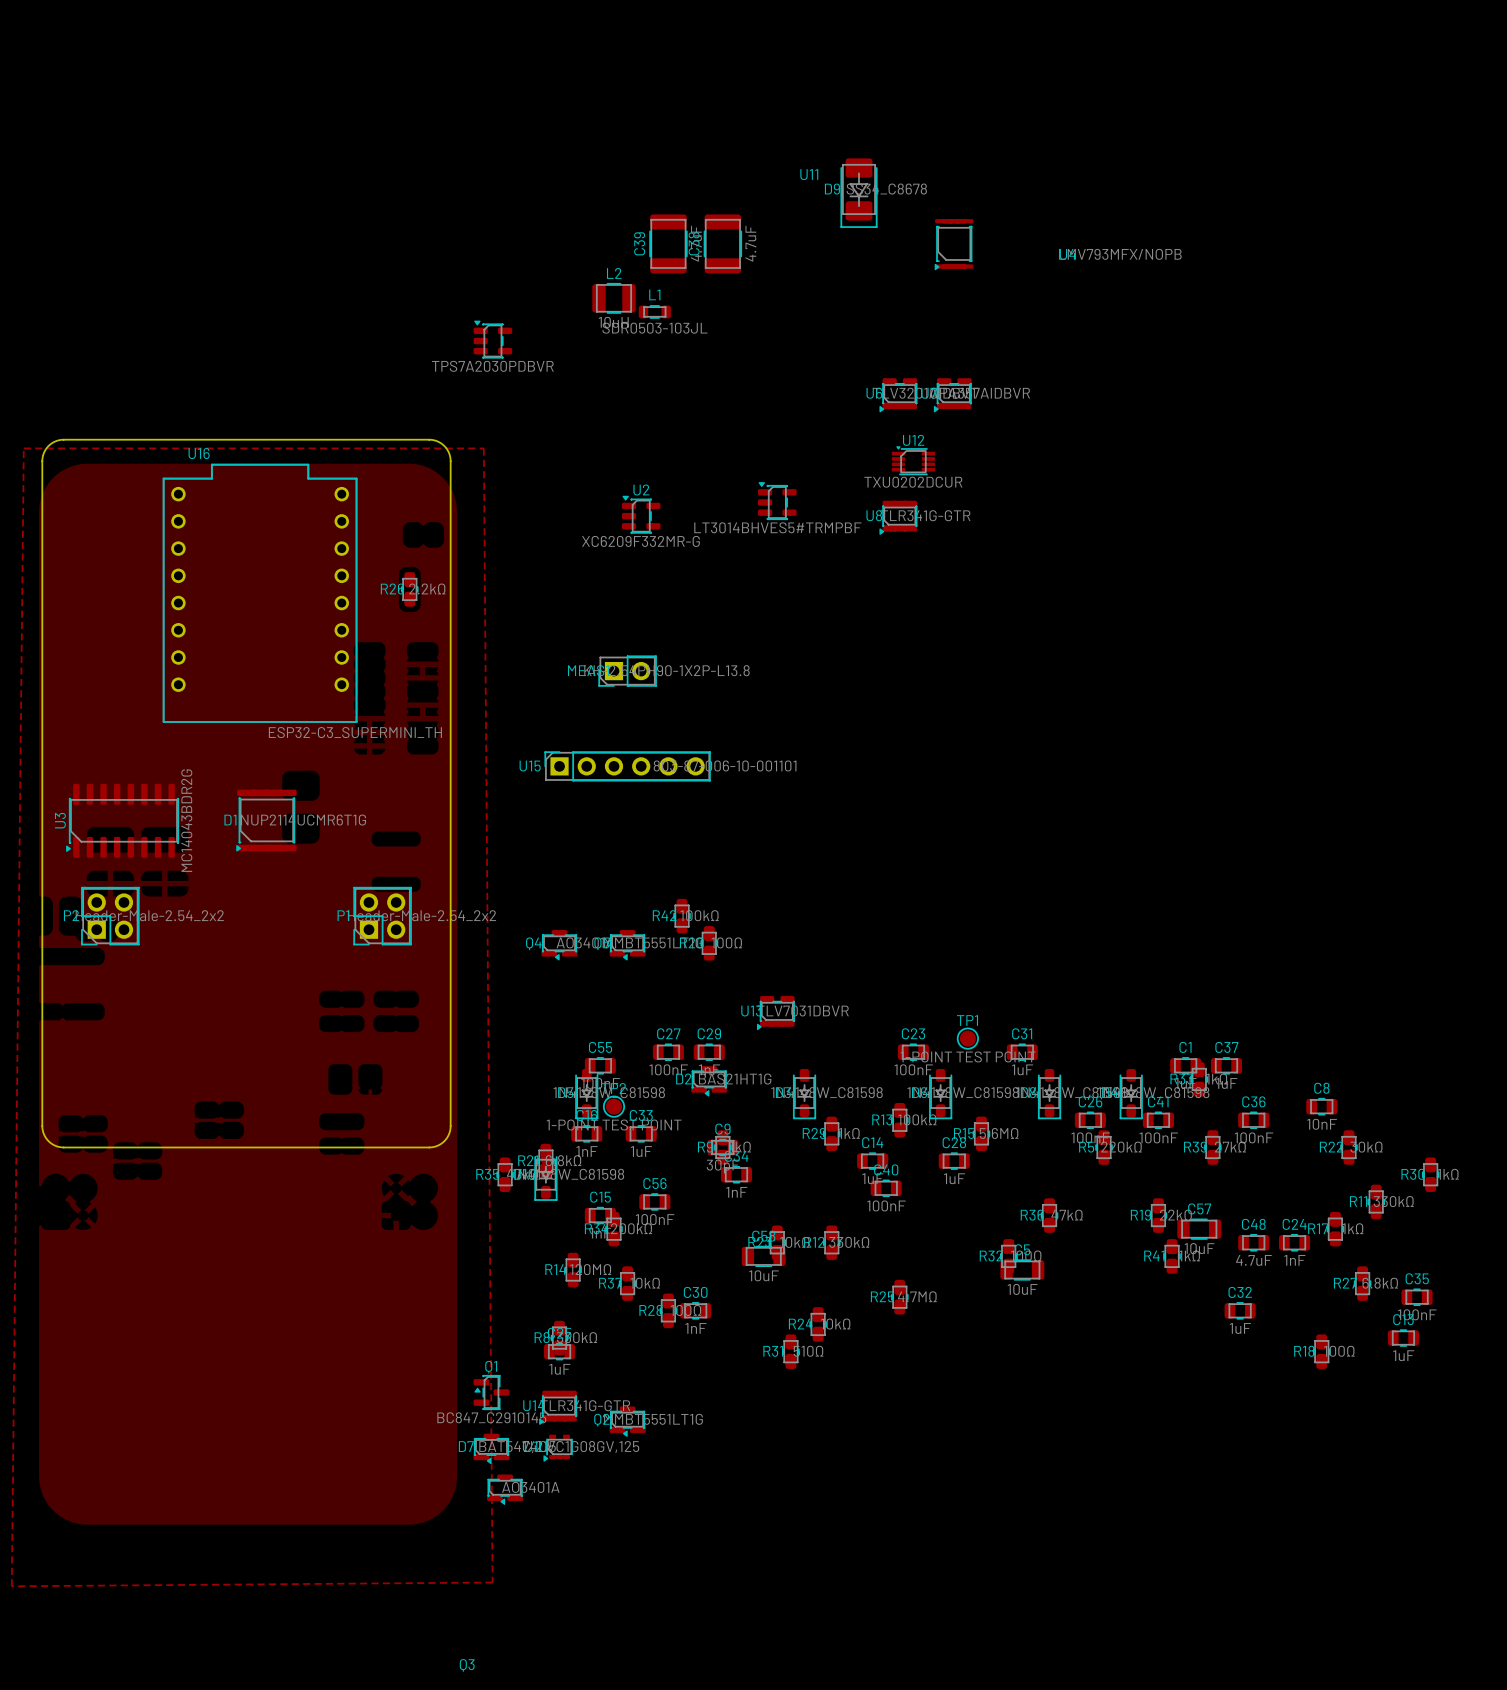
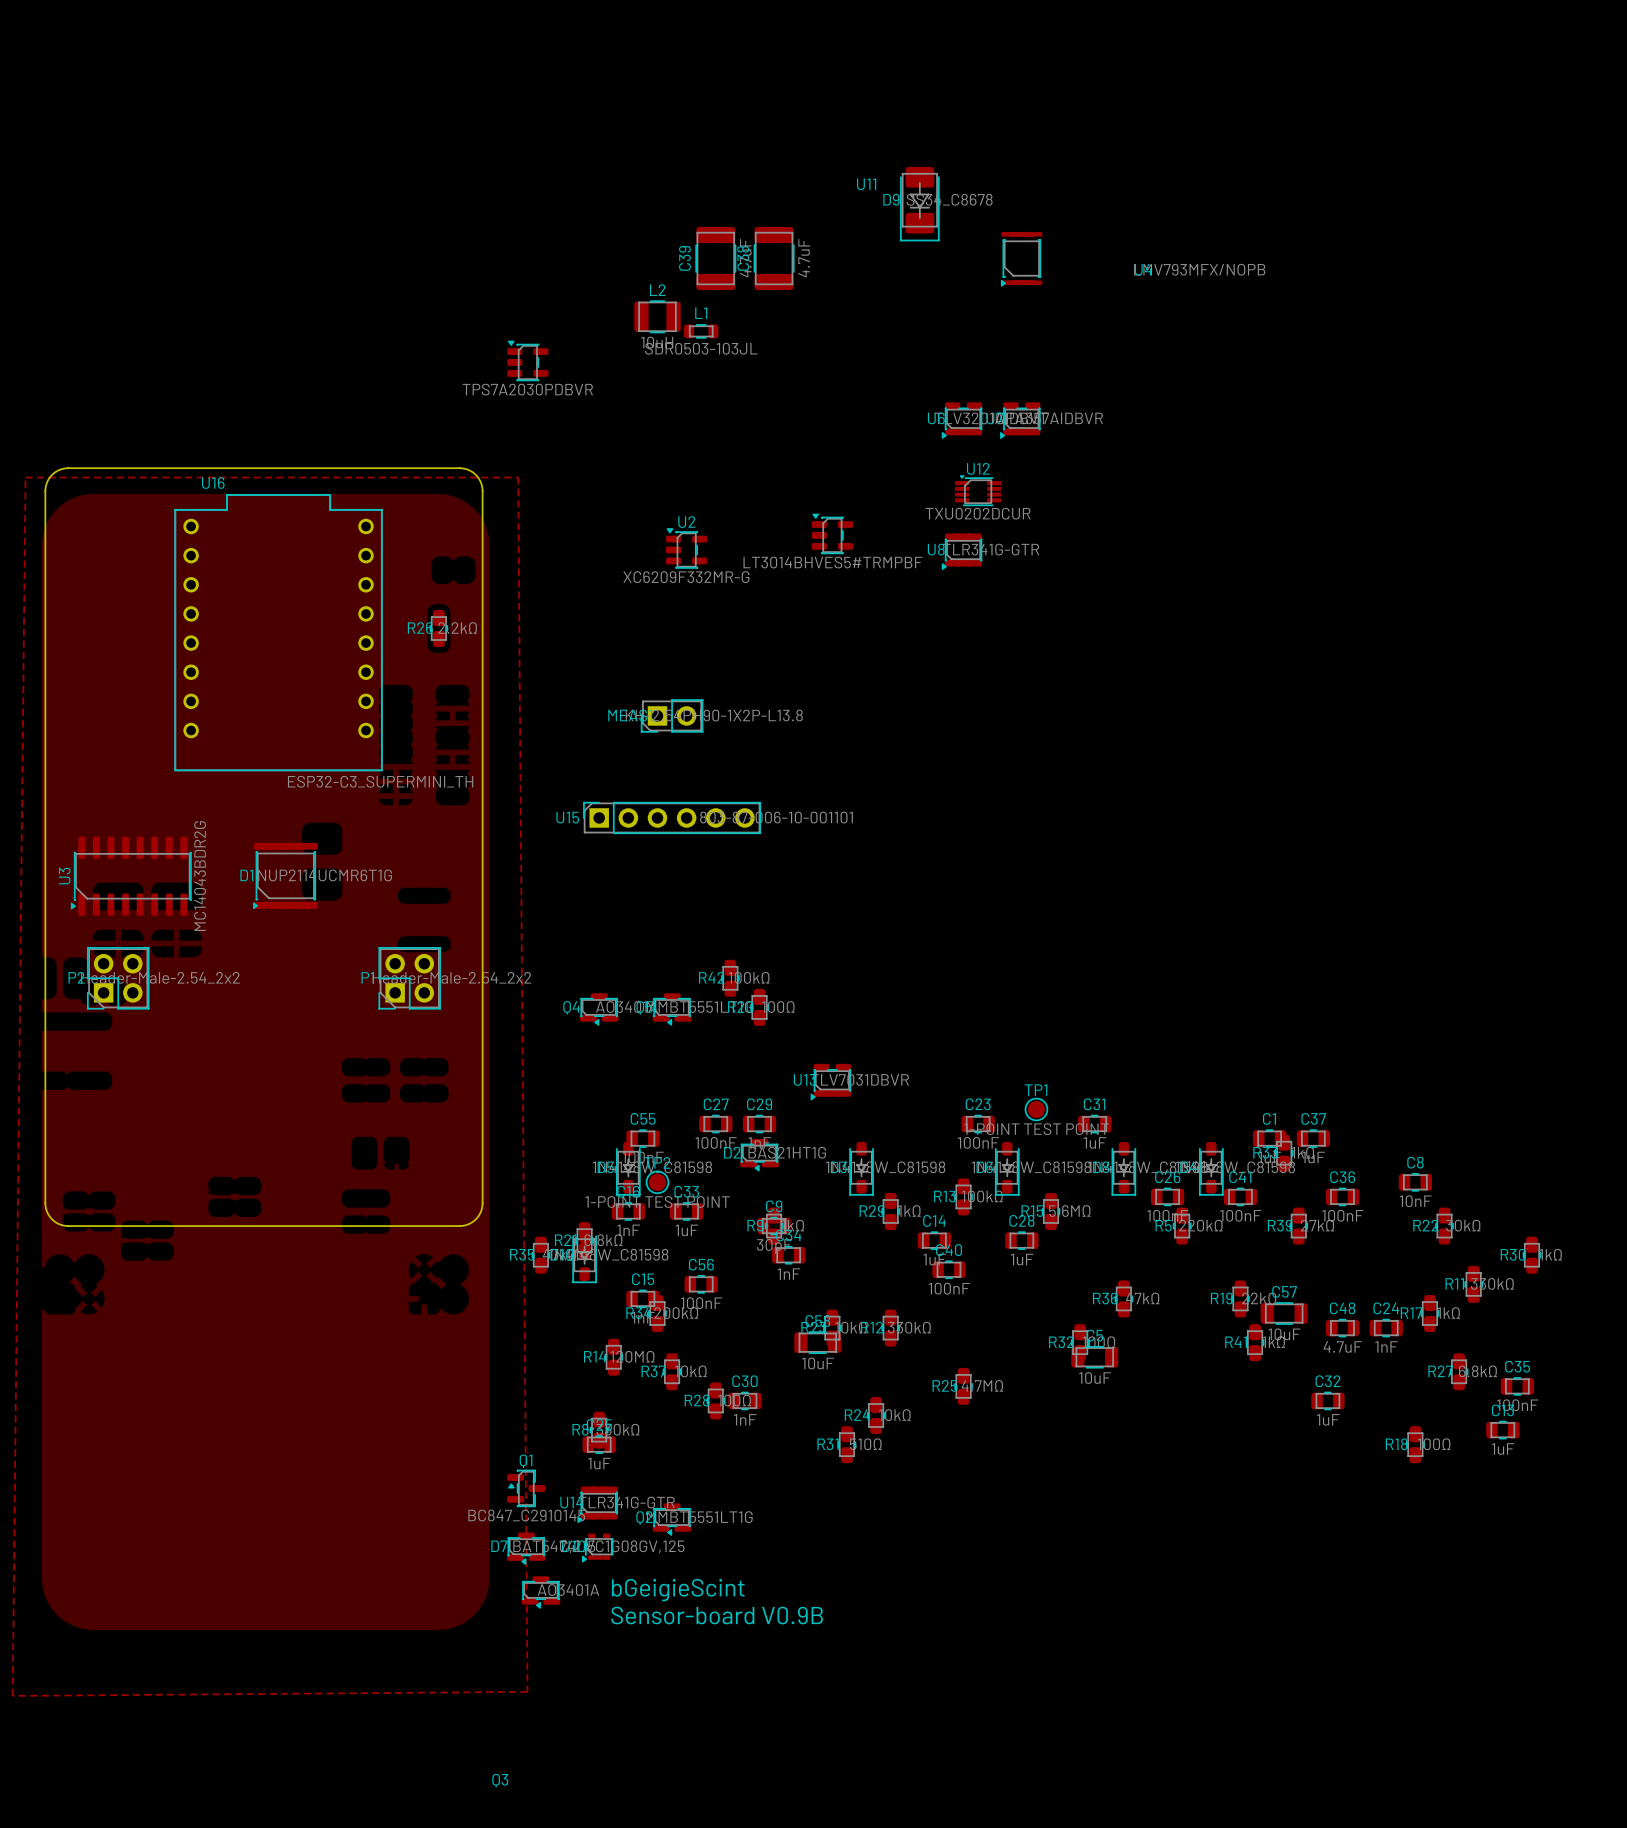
text: none -> bGeigieScint (678, 1590)
text: none -> Sensor-board V0.9B (717, 1615)

